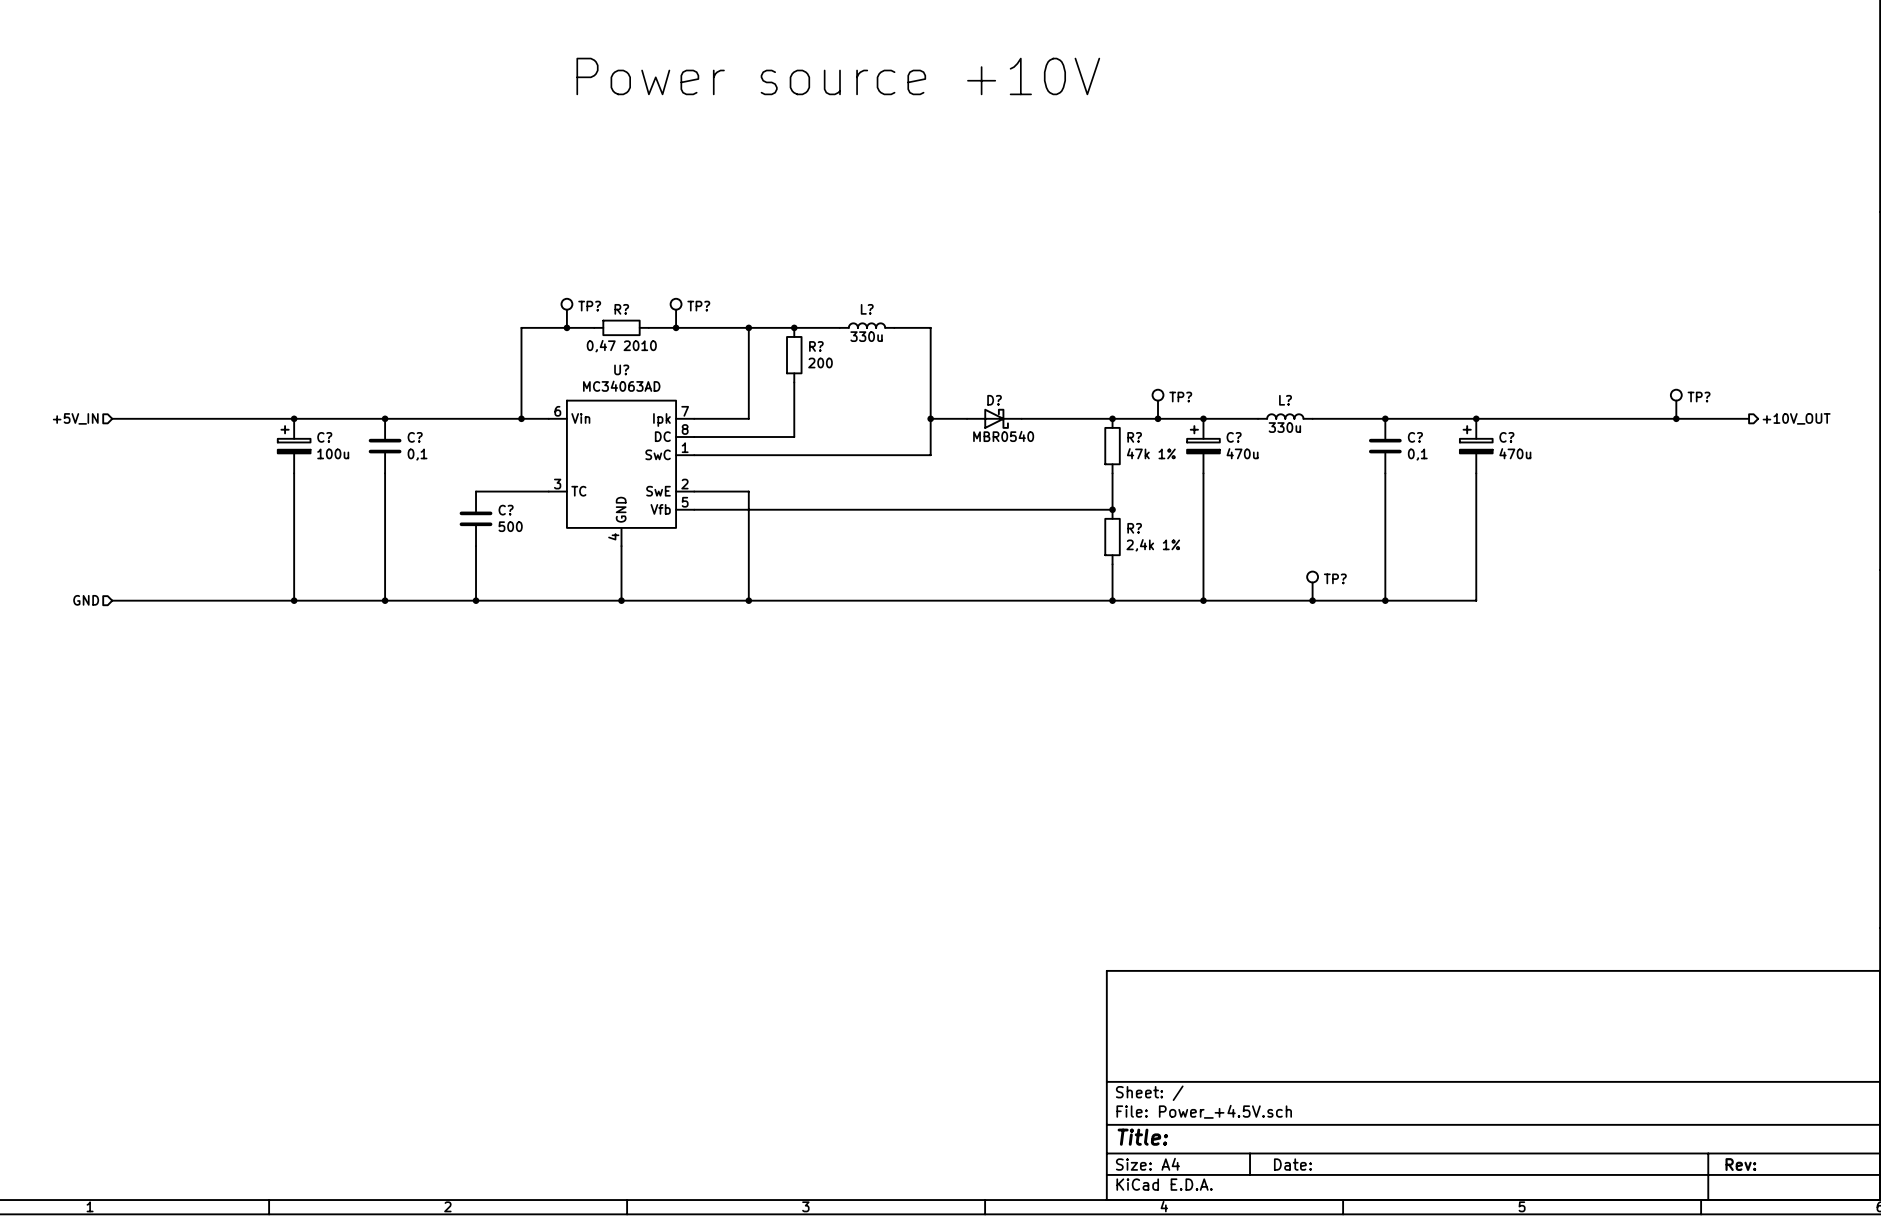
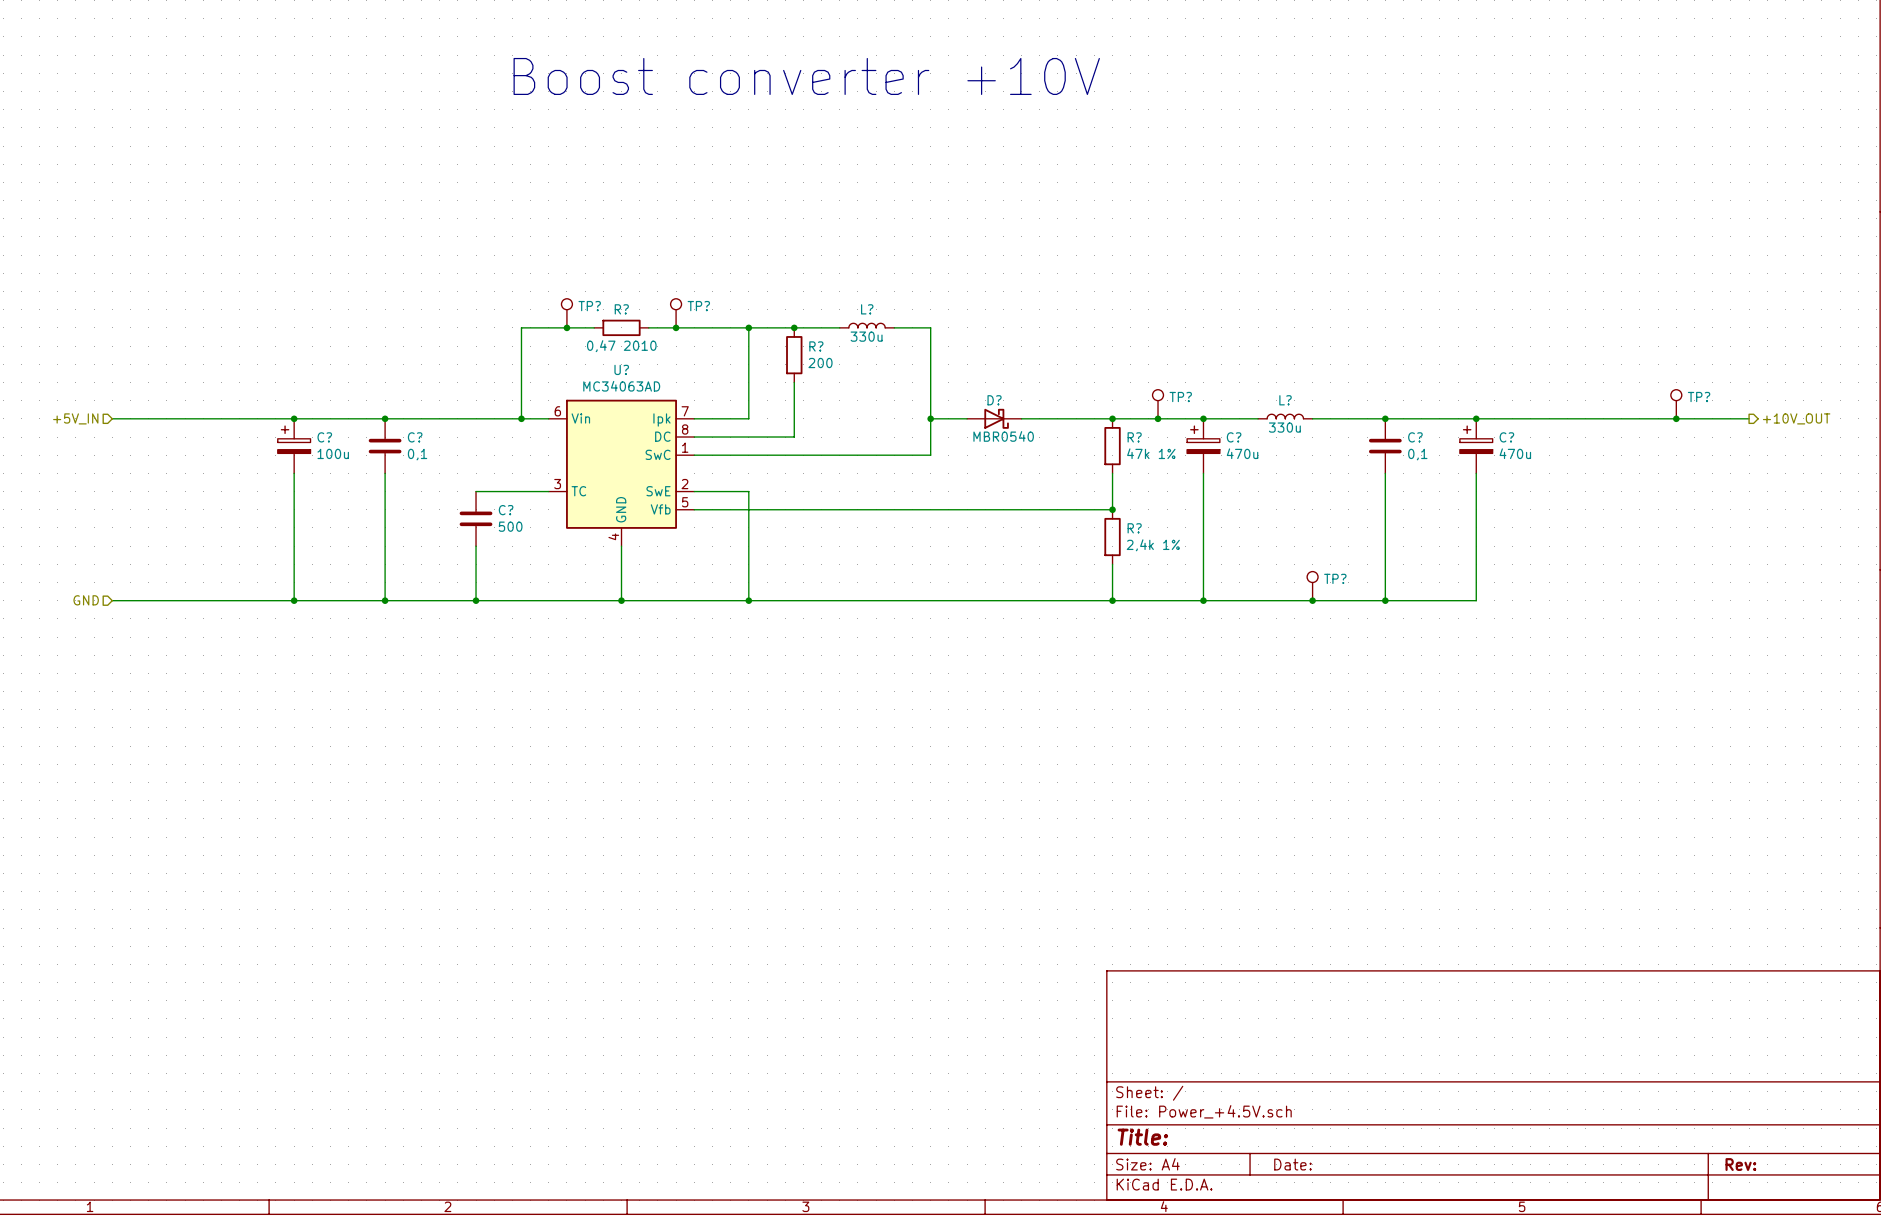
text: Power source +10V (838, 76) -> Boost converter +10V (806, 76)

